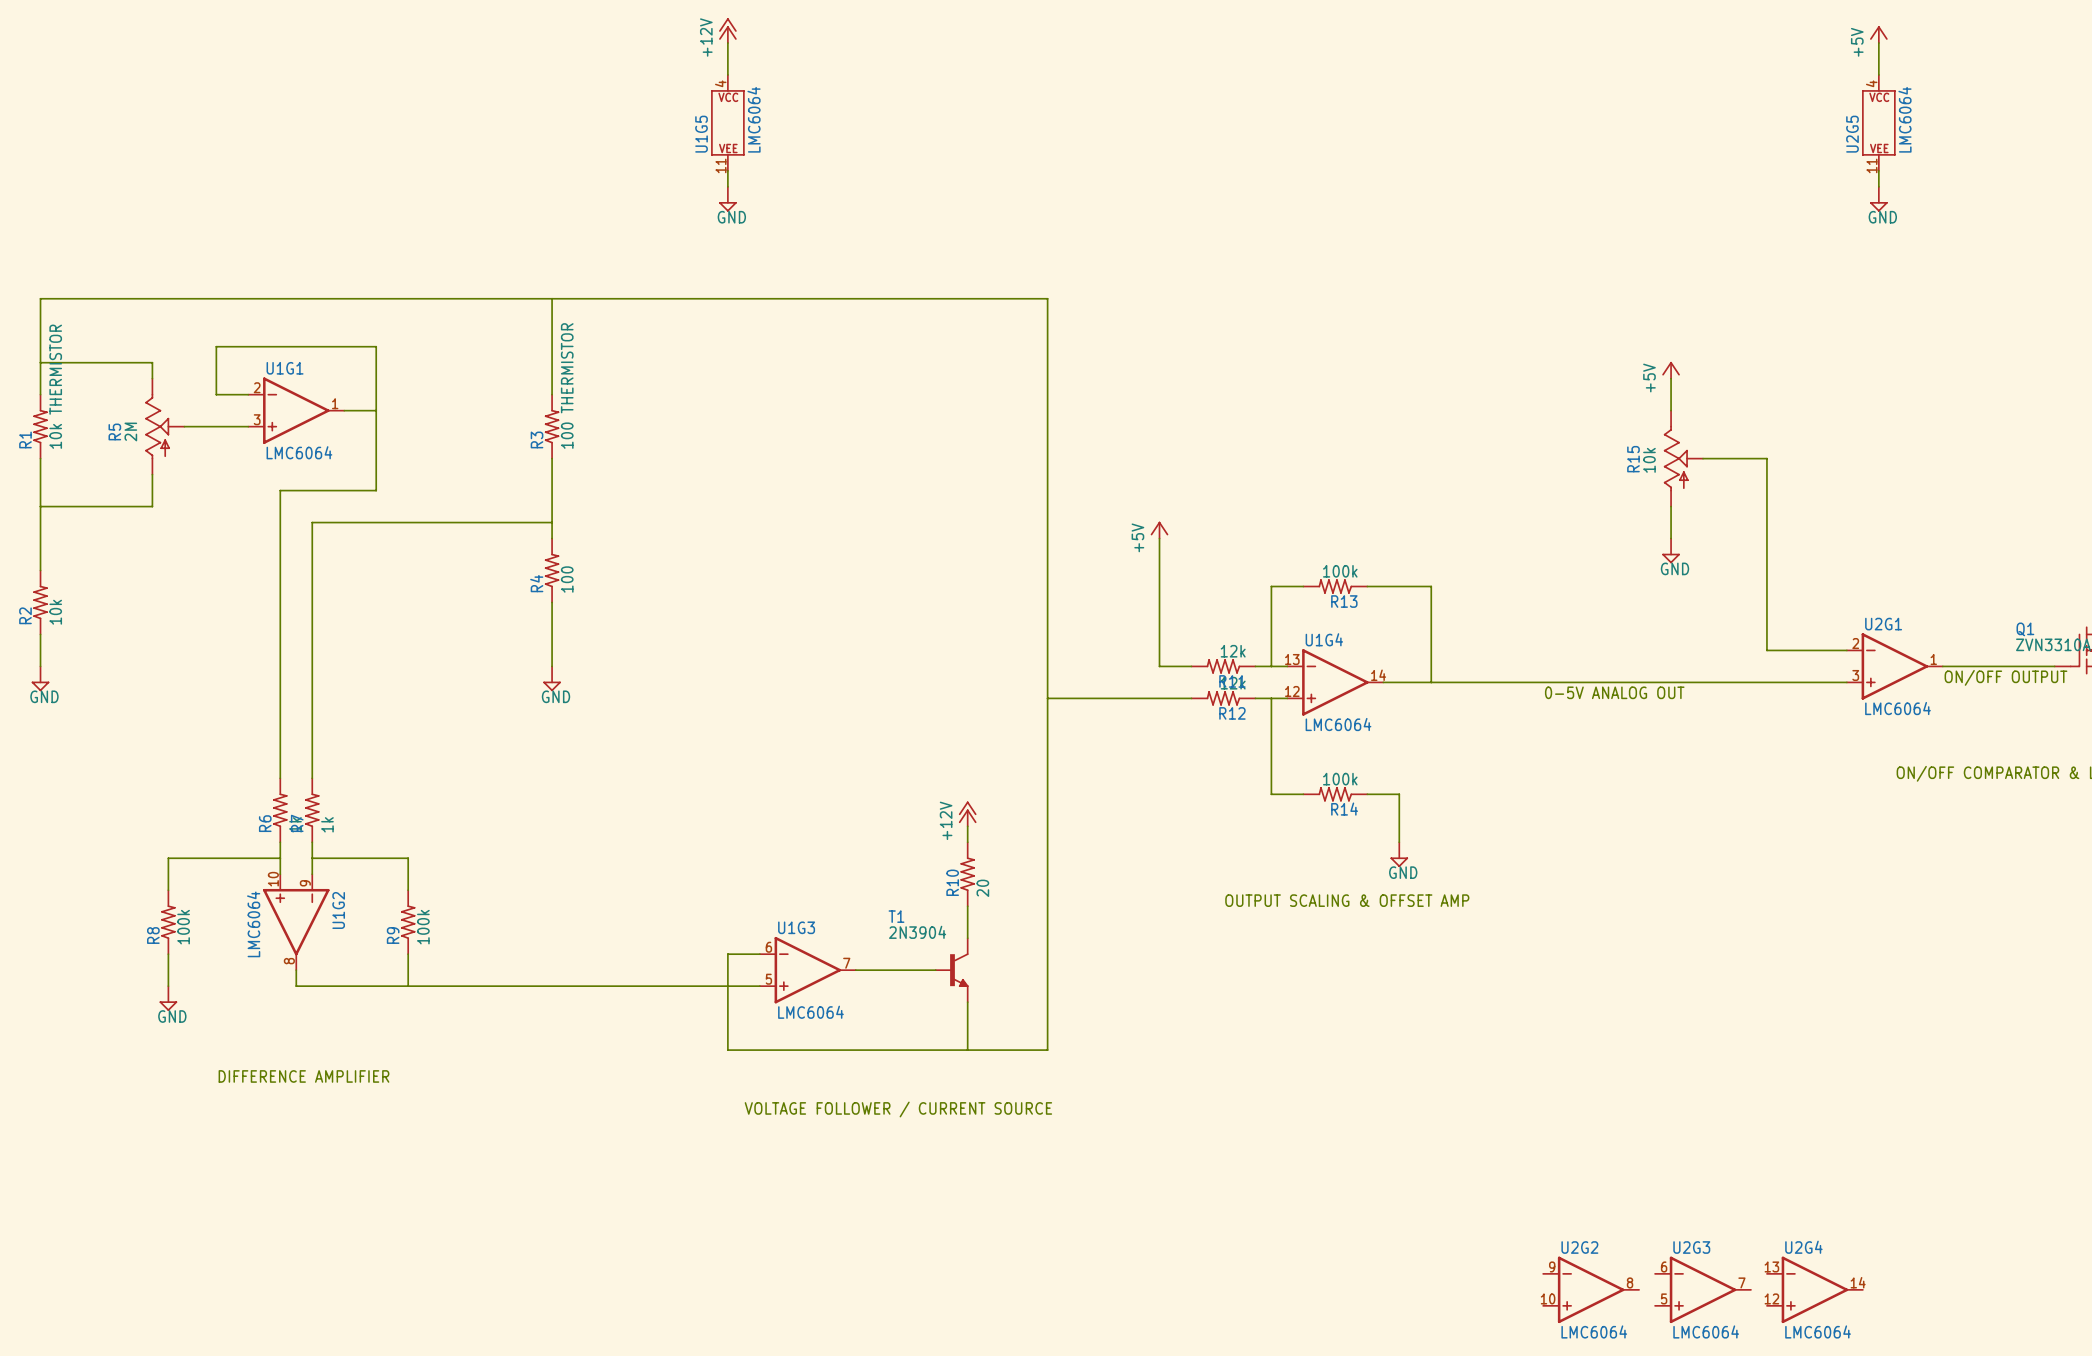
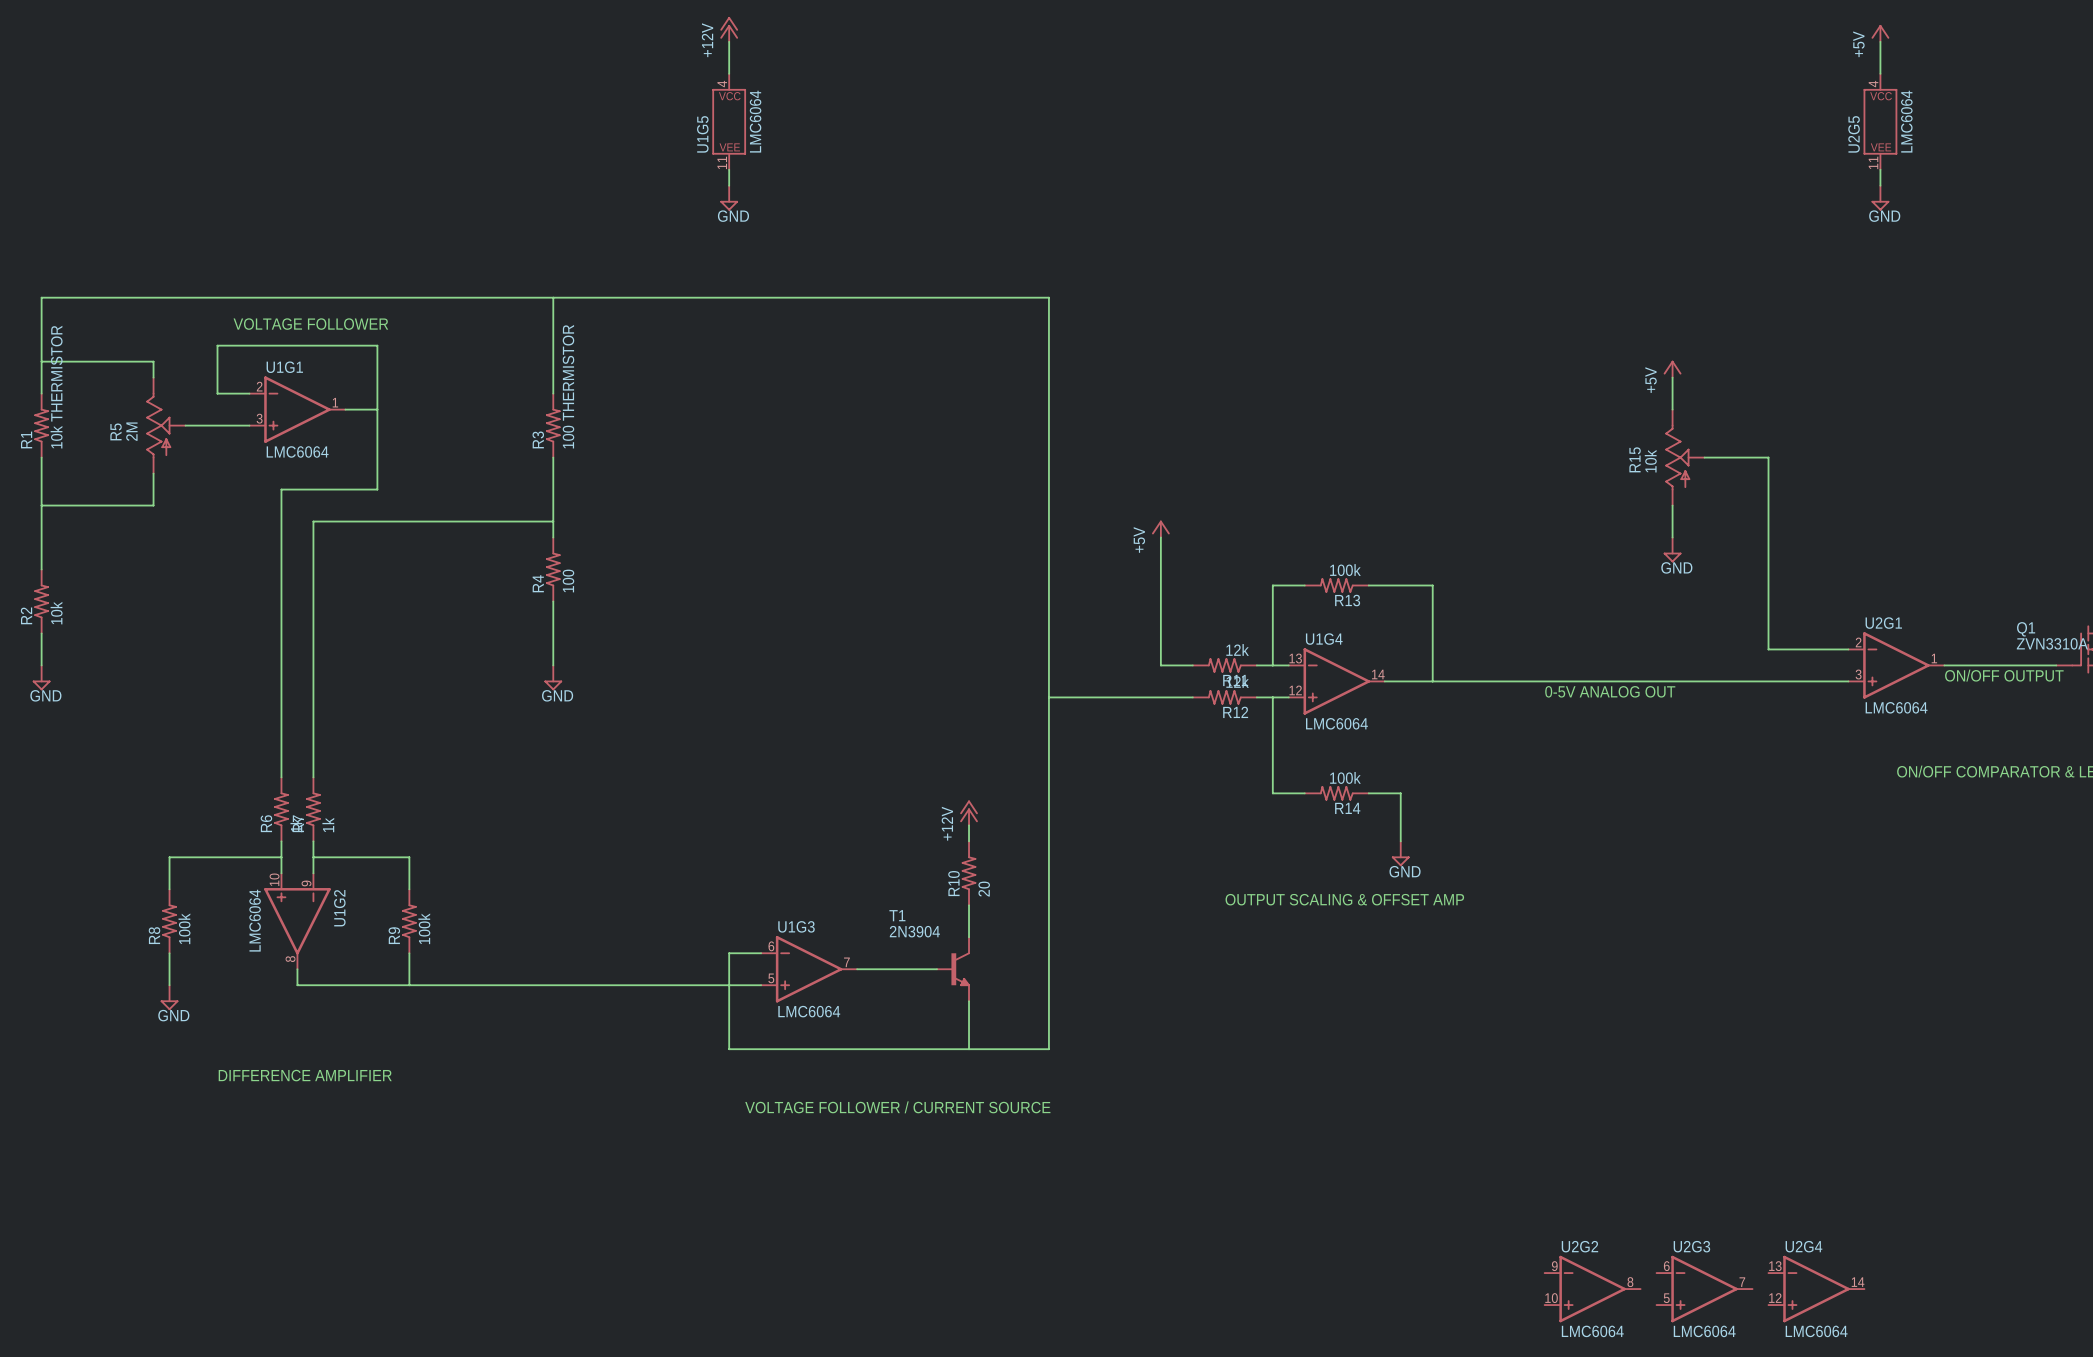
text: none -> VOLTAGE FOLLOWER (310, 324)

